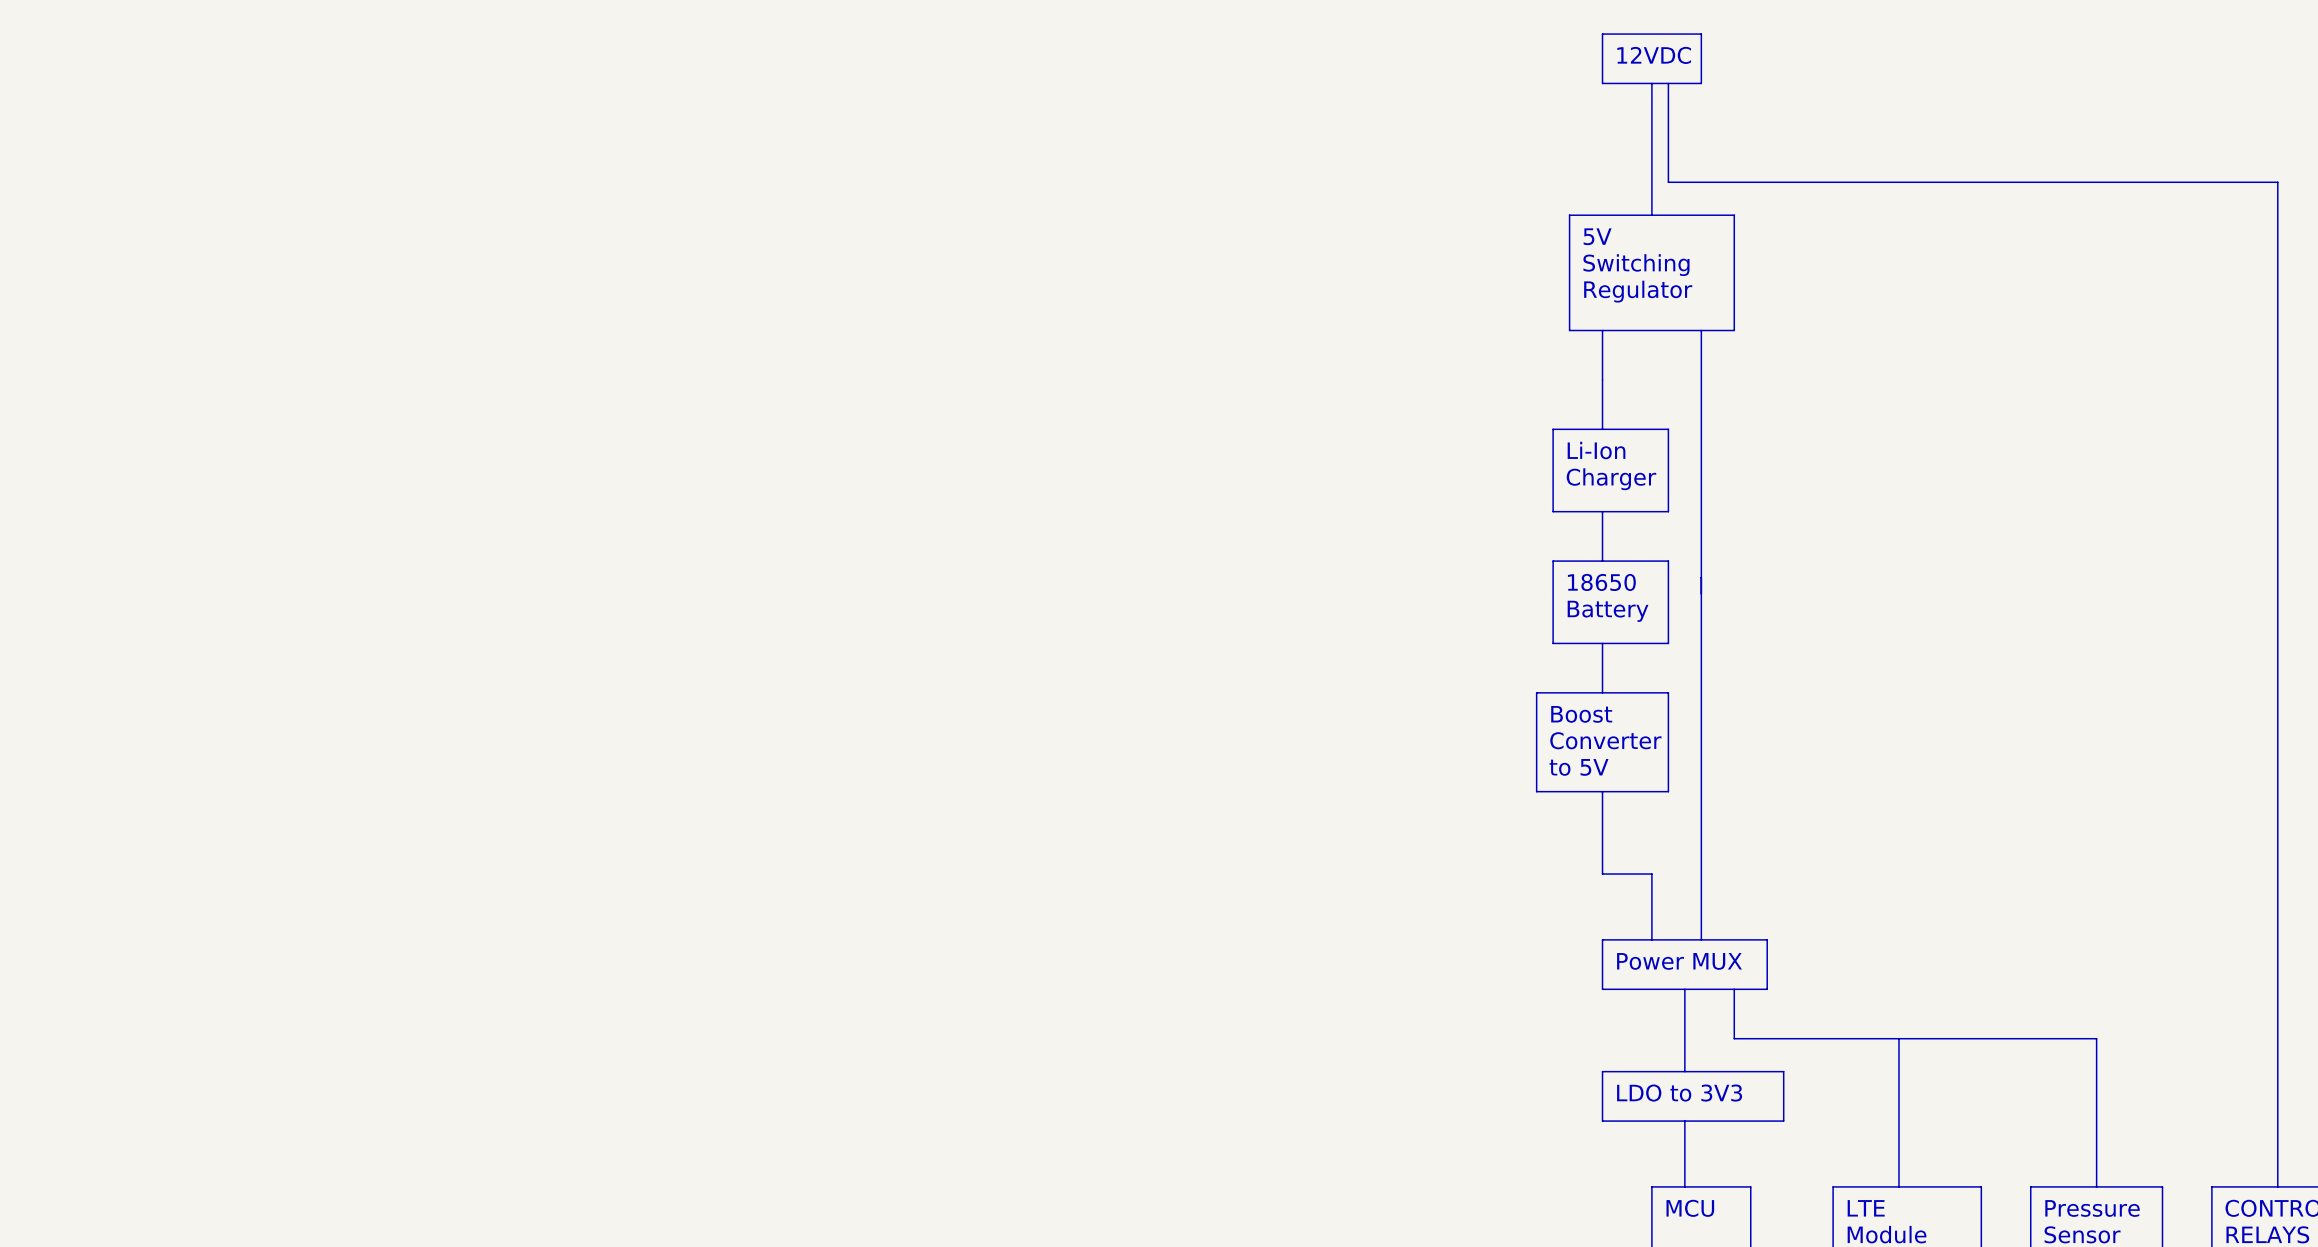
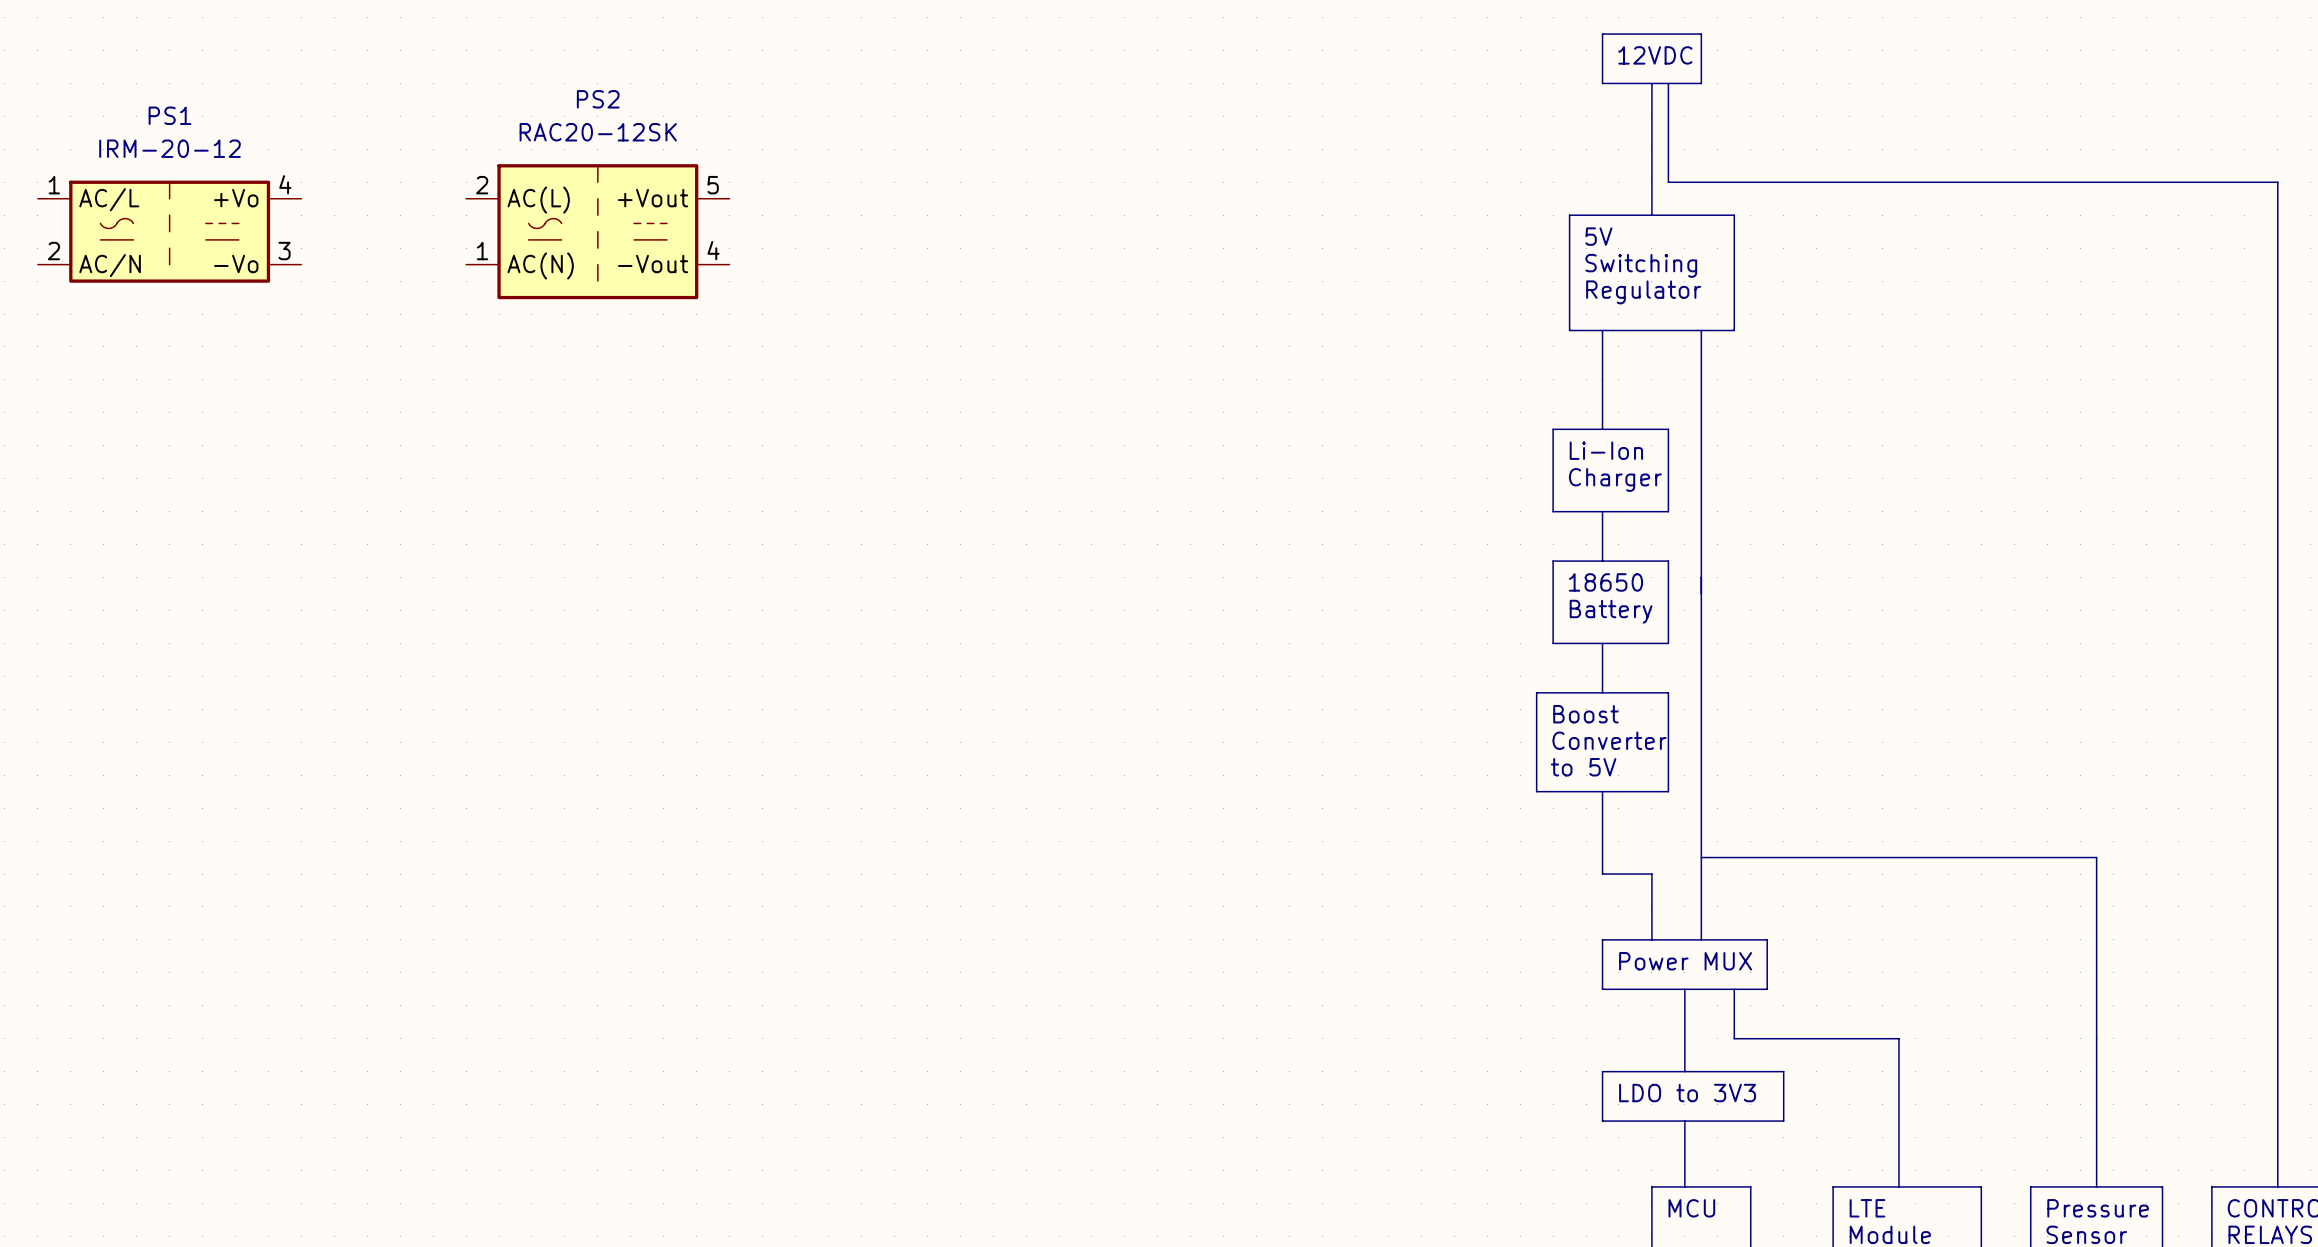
PS1: none -> IRM-20-12 (169, 231)
PS2: none -> RAC20-12SK (597, 231)
line: (1898, 1038) (2096, 1038) -> (1701, 857) (2096, 857) (2096, 1038)

